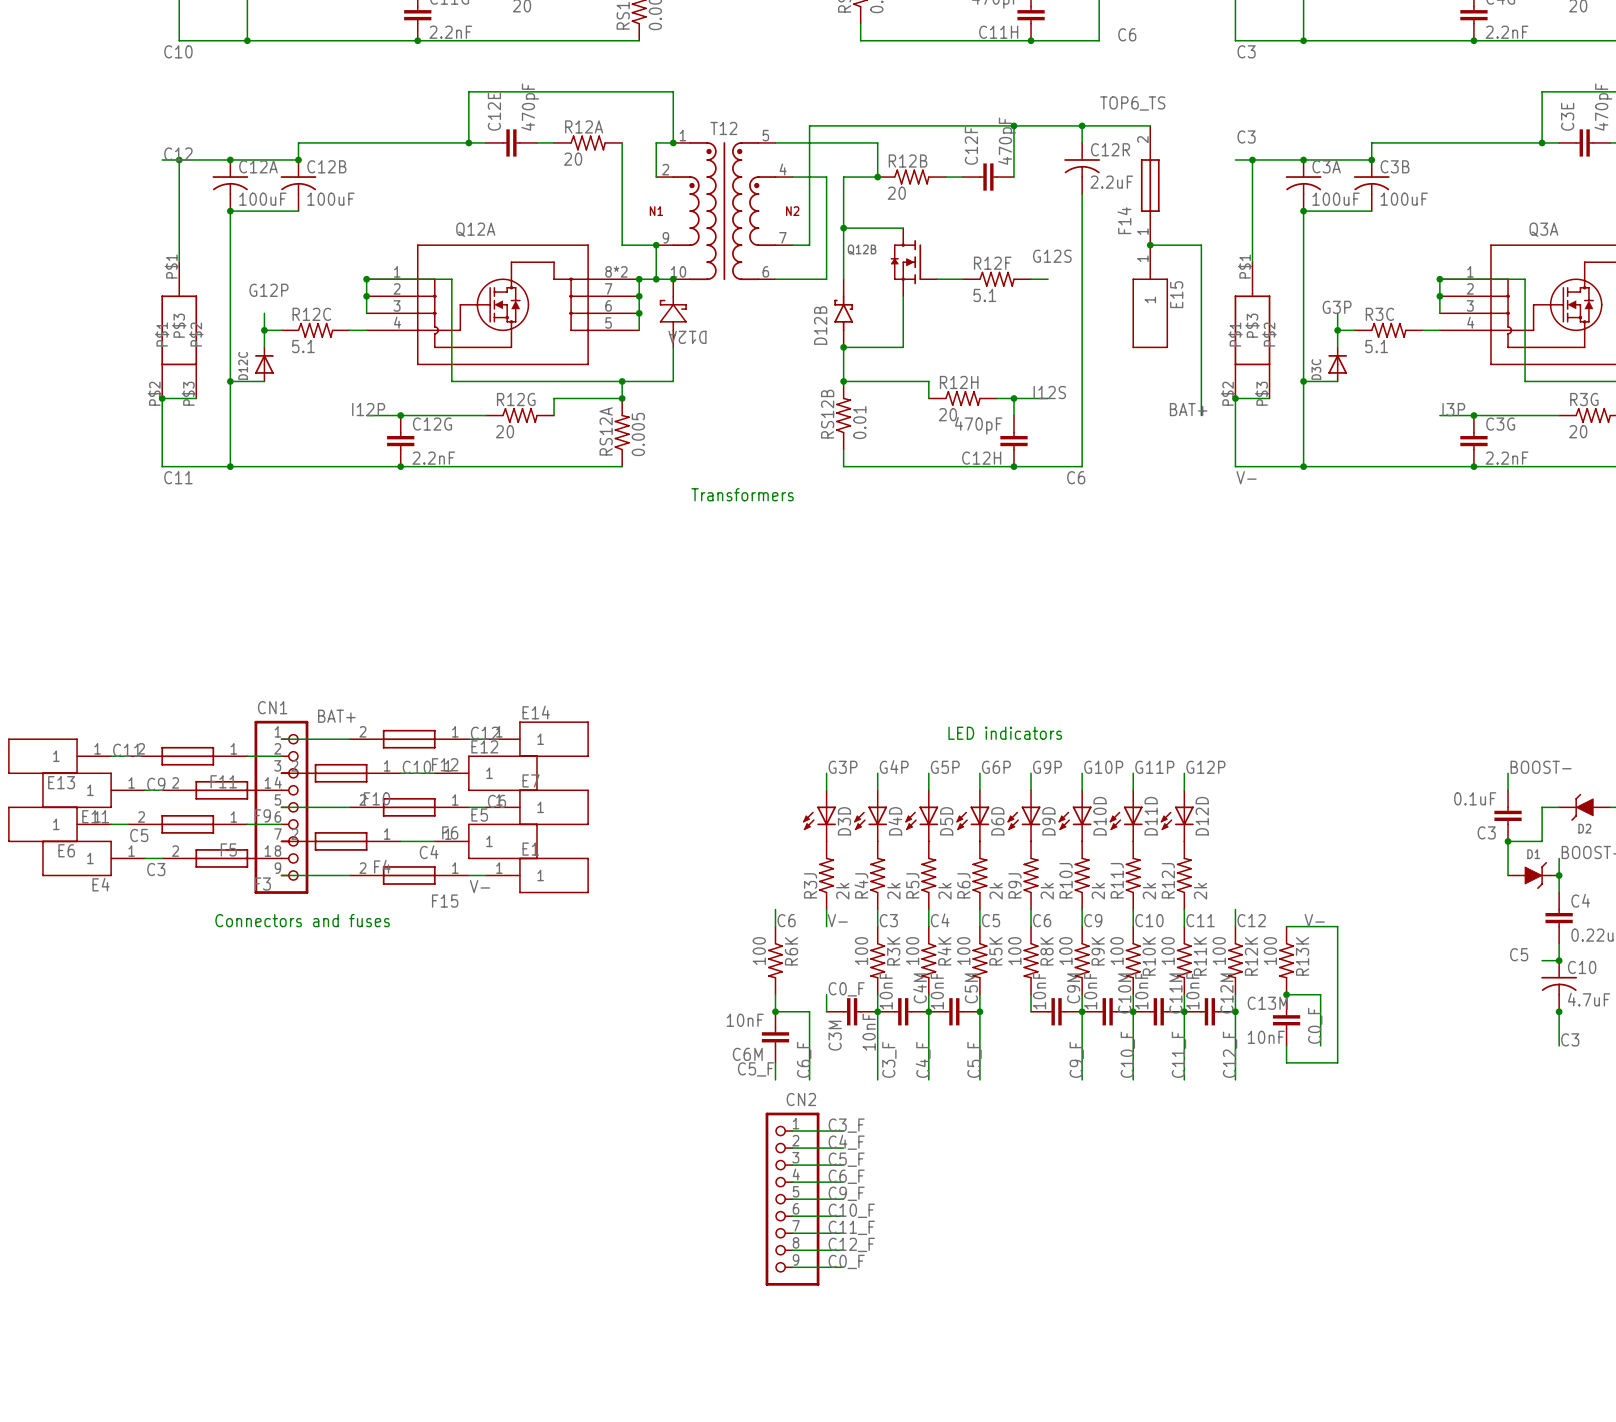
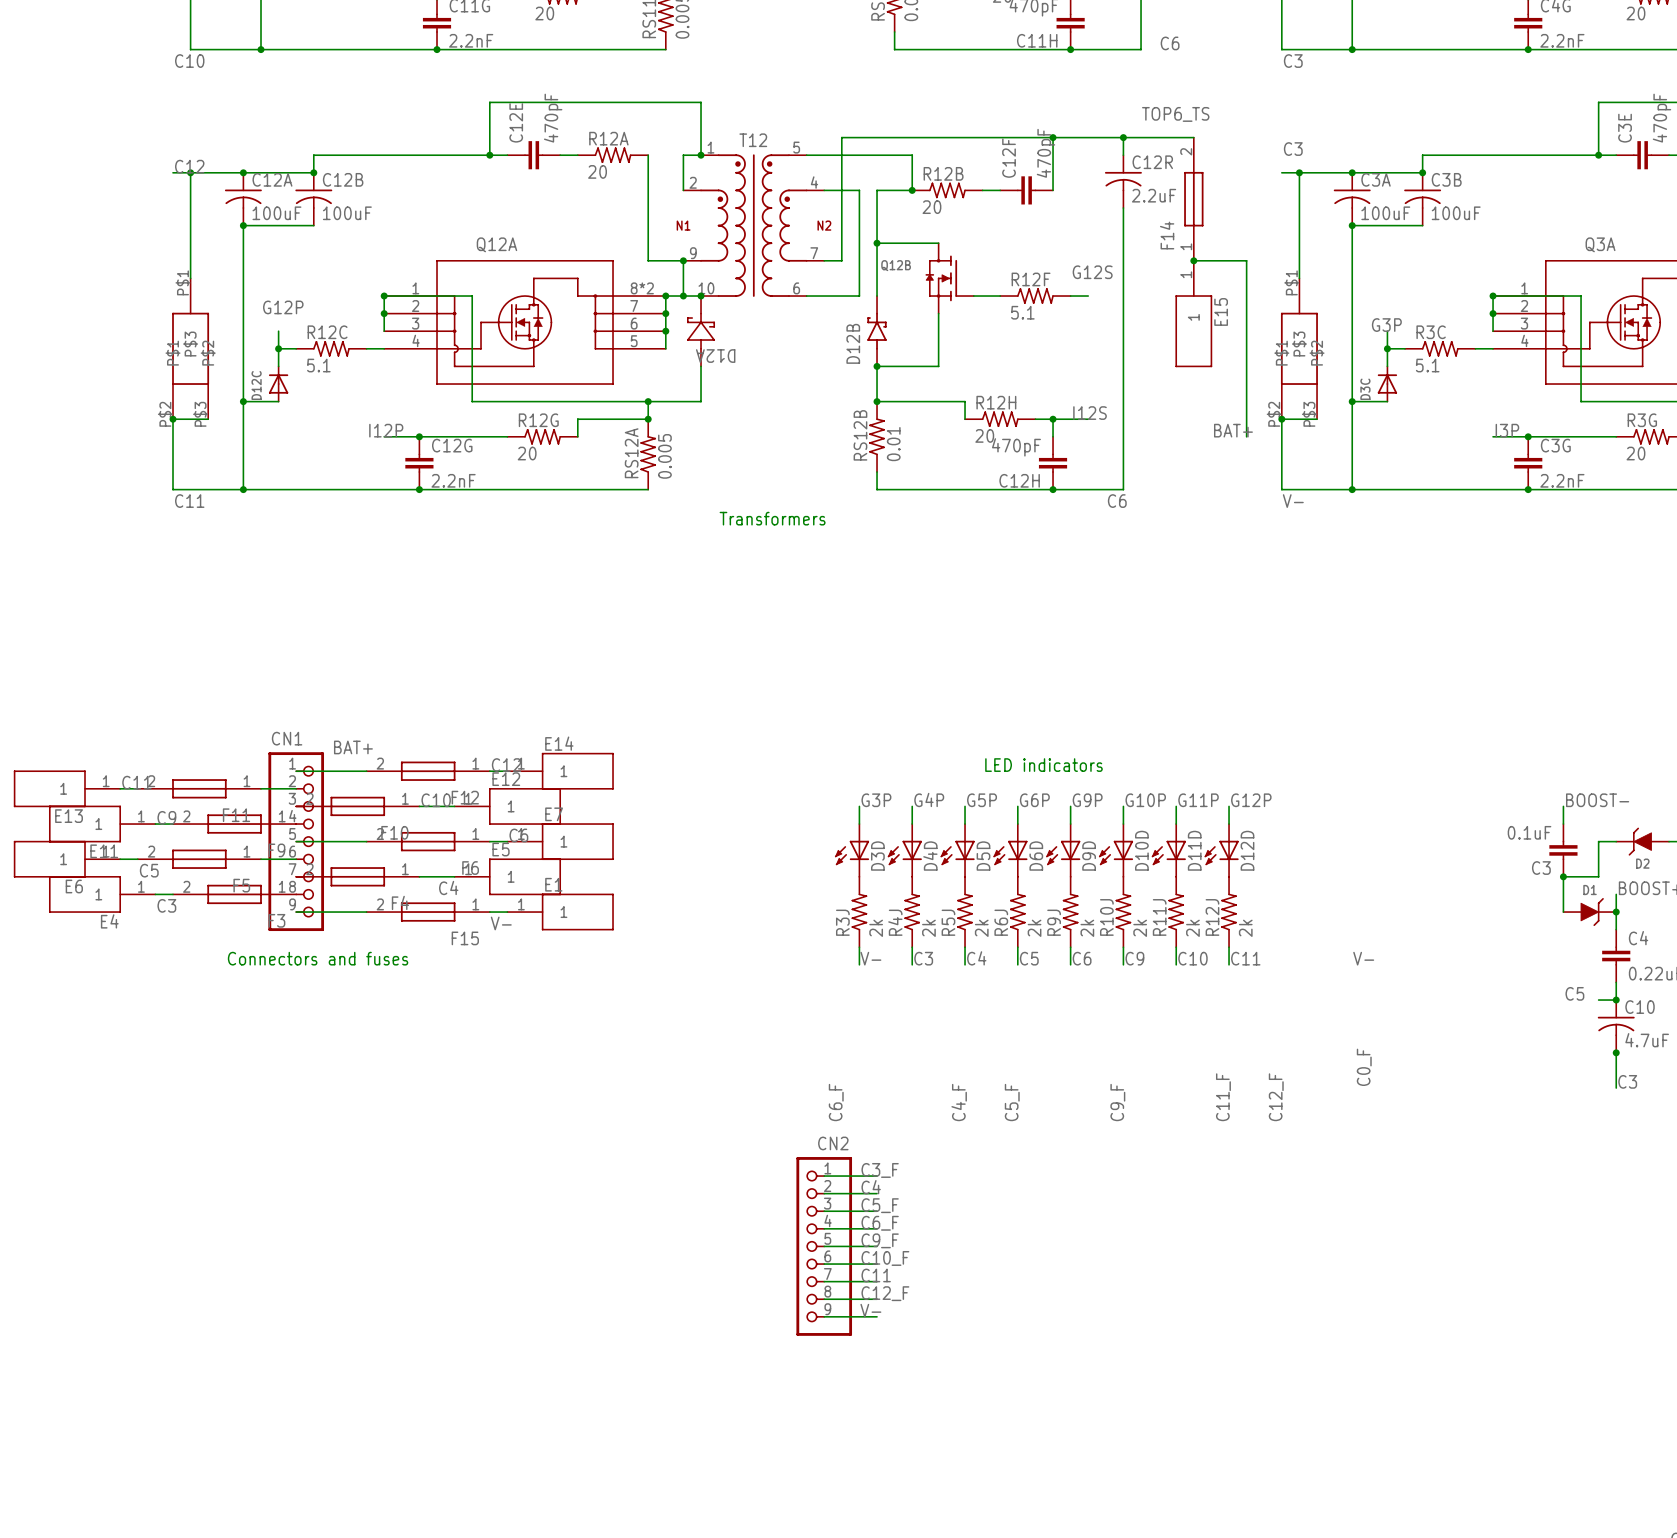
wire: (775, 909) (775, 926) -> none
wire: (1235, 909) (1235, 926) -> none
label: C6 (786, 920) -> none
label: C12 (1251, 920) -> none
wire: (1286, 926) (1337, 926) (1337, 1062) (1286, 1062) (1286, 1045) -> none
R6K: 100 (775, 960) -> none
R3K: 100 (877, 960) -> none
R4K: 100 (928, 960) -> none
R5K: 100 (979, 960) -> none
R8K: 100 (1031, 960) -> none
R9K: 100 (1082, 960) -> none
R10K: 100 (1133, 960) -> none
R11K: 100 (1184, 960) -> none
R12K: 100 (1235, 960) -> none
R13K: 100 (1286, 960) -> none
label: C0_F (846, 989) -> none
wire: (775, 994) (775, 1011) (809, 1011) (809, 1079) -> none
wire: (826, 994) (826, 1011) -> none
wire: (877, 994) (877, 1079) -> none
wire: (928, 994) (928, 1079) -> none
wire: (979, 994) (979, 1079) -> none
wire: (1031, 994) (1031, 1011) -> none
wire: (1082, 994) (1082, 1079) -> none
wire: (1133, 994) (1133, 1079) -> none
wire: (1184, 994) (1184, 1079) -> none
wire: (1235, 994) (1235, 1079) -> none
wire: (1286, 994) (1320, 994) (1320, 1045) -> none
junction: (1286, 994) -> none
junction: (775, 1011) -> none
C3M: 10nF (852, 1011) -> none
junction: (877, 1011) -> none
C4M: 10nF (903, 1011) -> none
junction: (928, 1011) -> none
C5M: 10nF (954, 1011) -> none
junction: (979, 1011) -> none
C9M: 10nF (1056, 1011) -> none
junction: (1082, 1011) -> none
C10M: 10nF (1107, 1011) -> none
junction: (1133, 1011) -> none
C11M: 10nF (1158, 1011) -> none
junction: (1184, 1011) -> none
C12M: 10nF (1209, 1011) -> none
junction: (1235, 1011) -> none
C13M: 10nF (1286, 1020) -> none
C6M: 10nF (775, 1037) -> none
label: C10_F (1127, 1054) -> none
label: C3_F (889, 1059) -> none
wire: (775, 1062) (775, 1079) -> none
label: C5_F (755, 1069) -> none
label: C4_F (846, 1142) -> C4 (871, 1187)
label: C11_F (851, 1227) -> C11 (876, 1275)
label: C0_F (846, 1261) -> V- (870, 1310)

